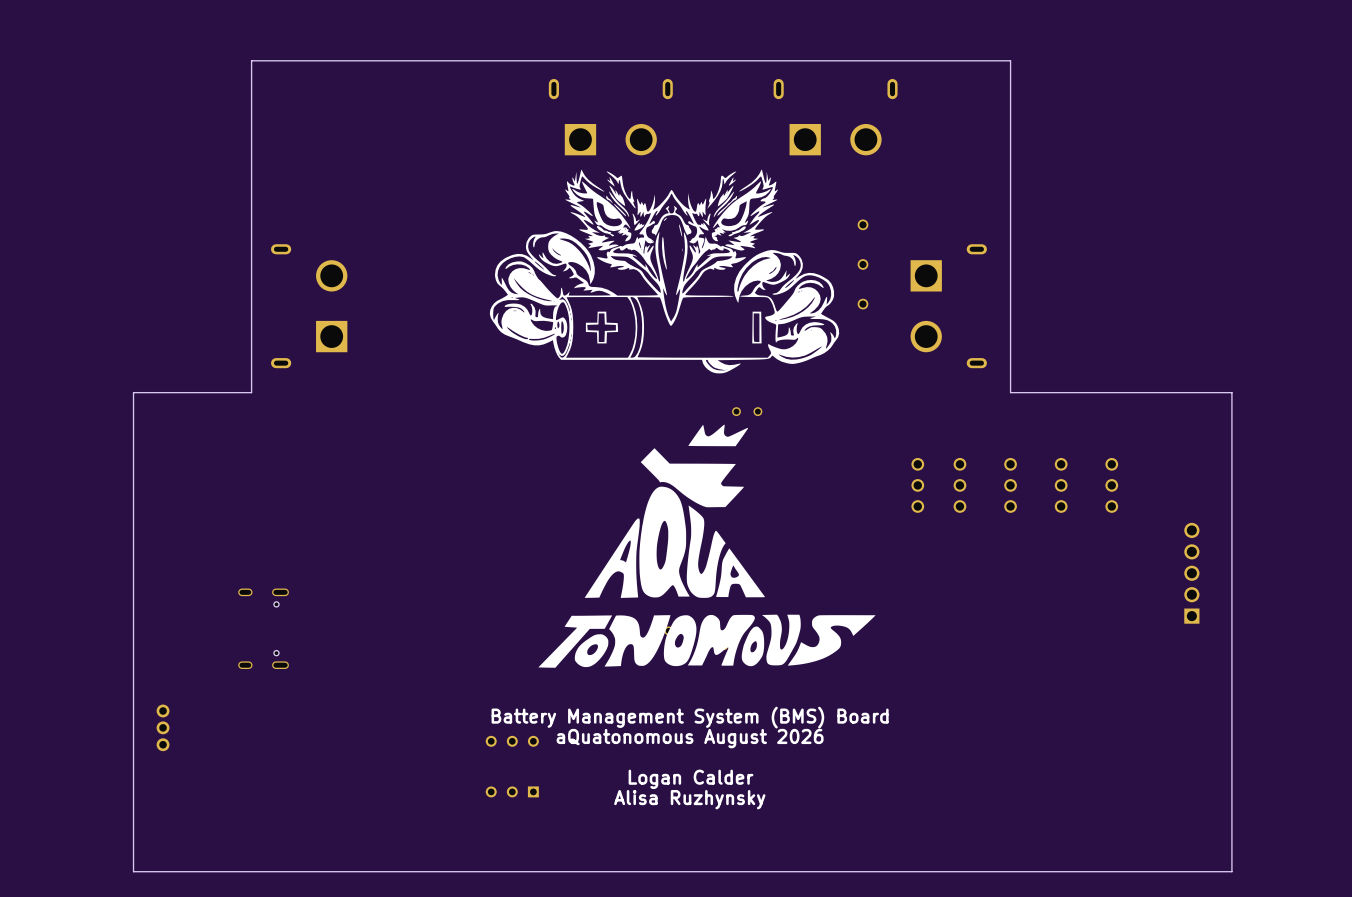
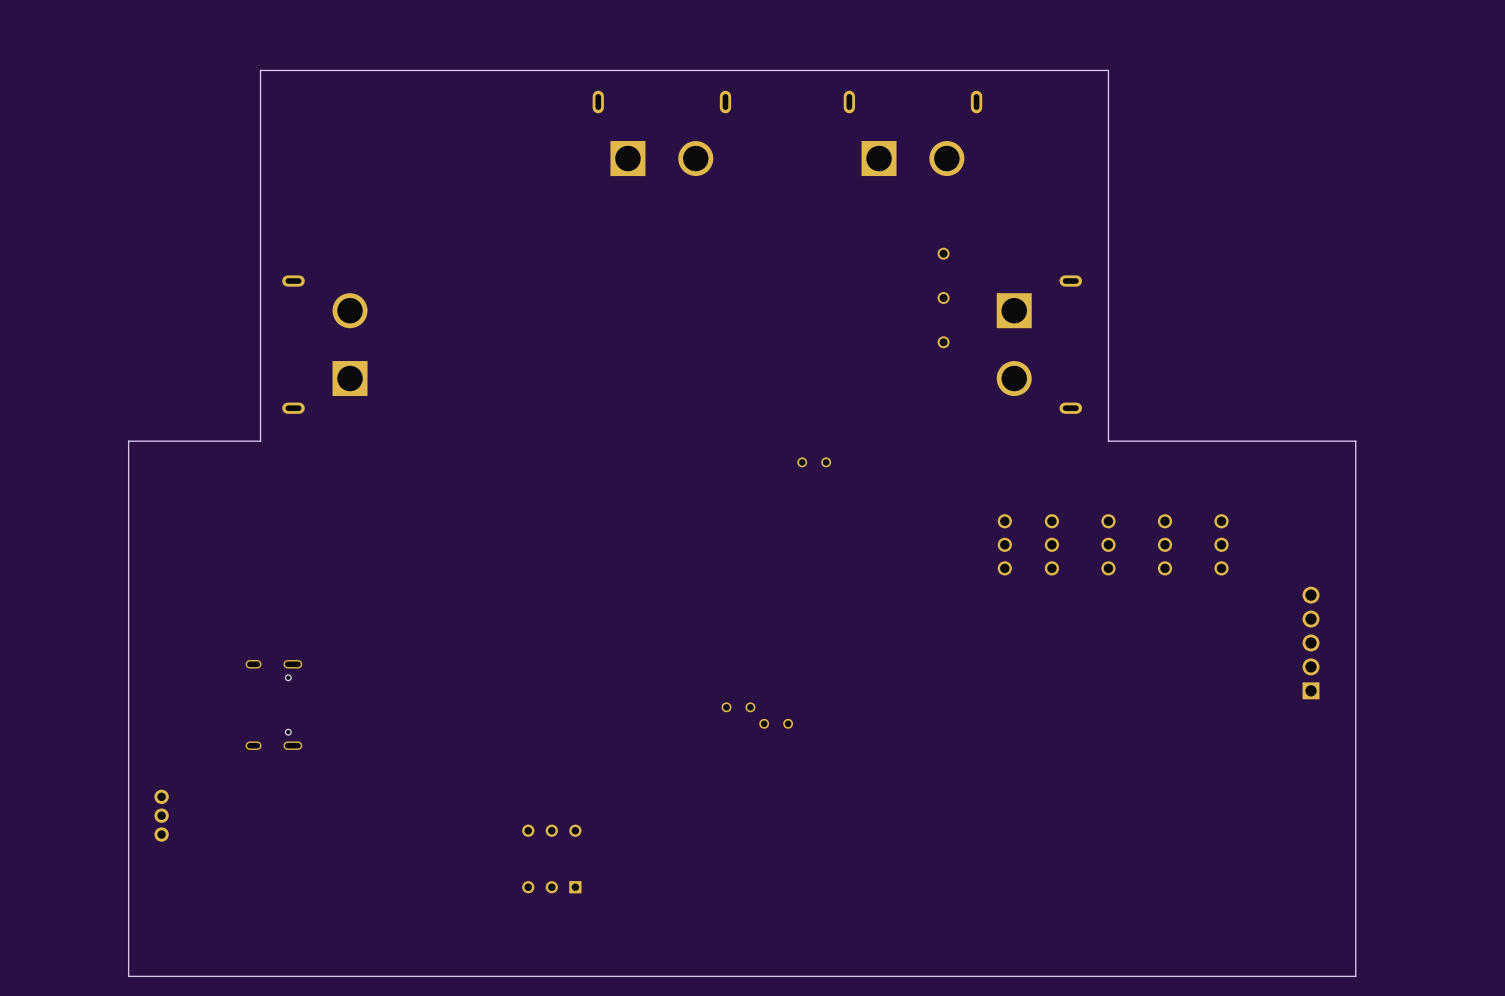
drawing: [489, 169, 840, 374] -> none
drawing: [538, 424, 876, 668] -> none
text: Battery Management System (BMS) Board (690, 717) -> none
text: aQuatonomous August 2026 (690, 738) -> none
text: Logan Calder (691, 779) -> none
text: Alisa Ruzhynsky (689, 799) -> none

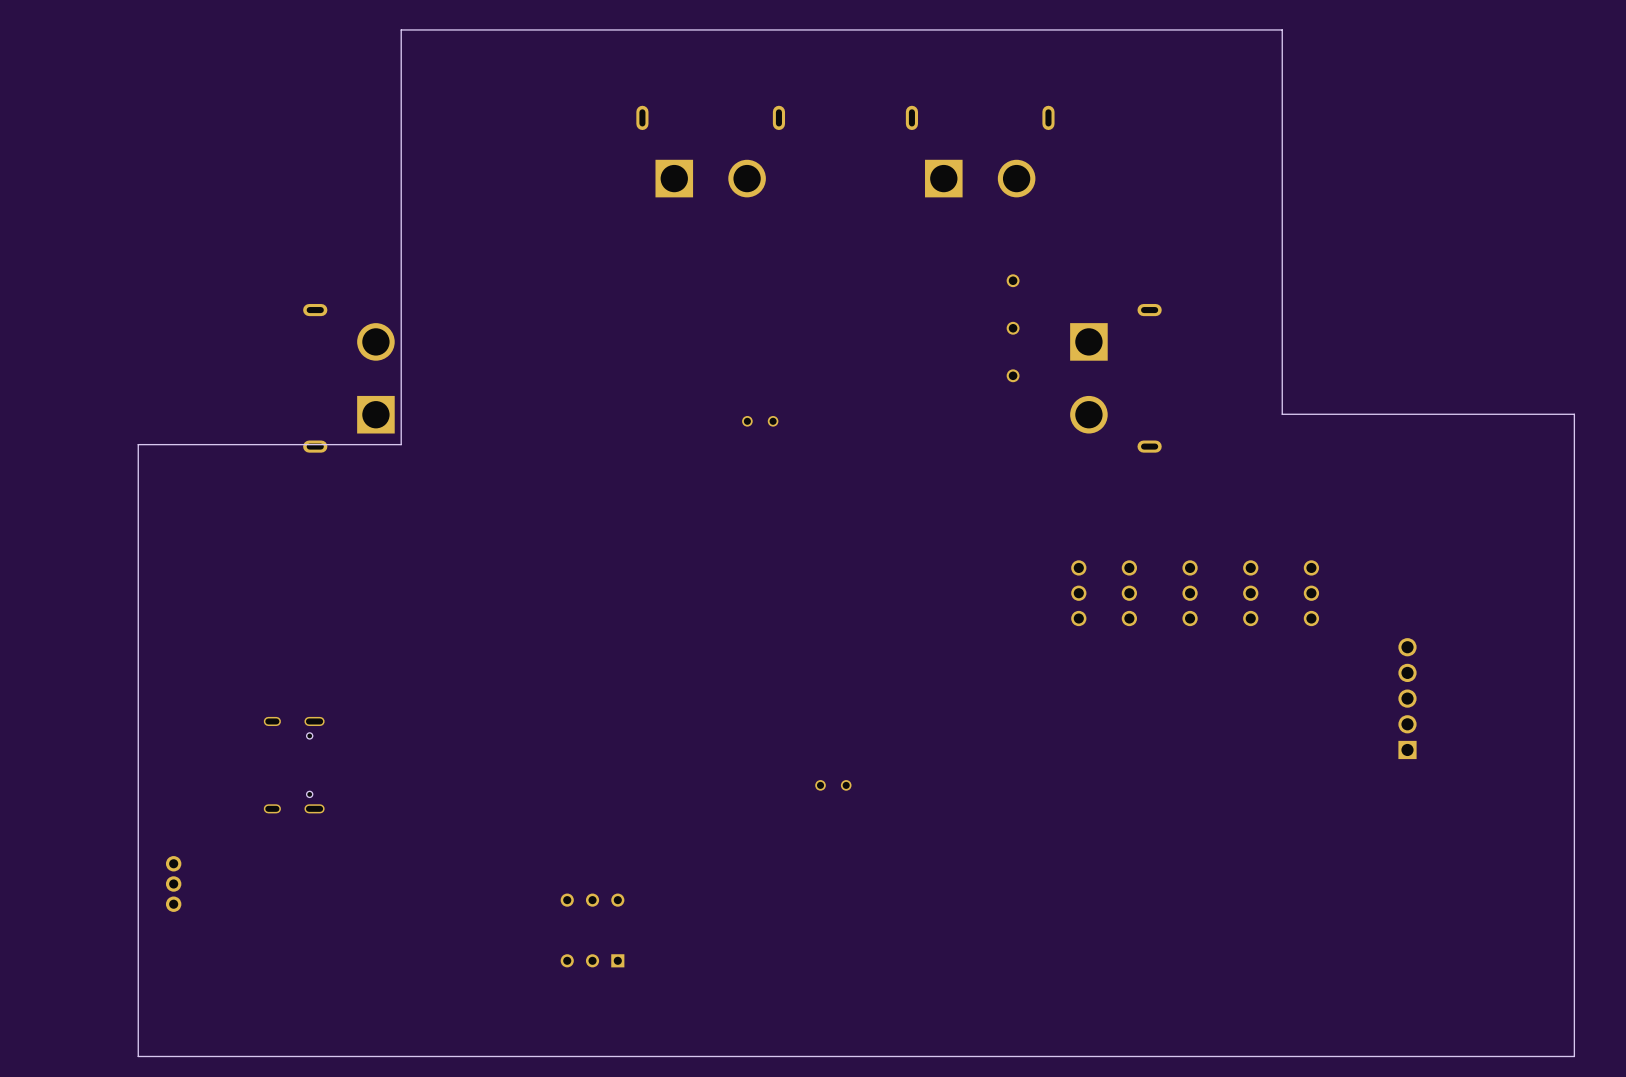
board edge: (128, 441) (260, 441) (260, 70) (1108, 70) (1108, 441) (1355, 441) (1355, 976) -> (138, 481) (138, 444) (401, 444) (401, 29) (1282, 29) (1282, 414) (1574, 414) (1574, 1056) (1455, 1056)
part position: (814, 462) -> (760, 421)
part: (738, 707) -> none

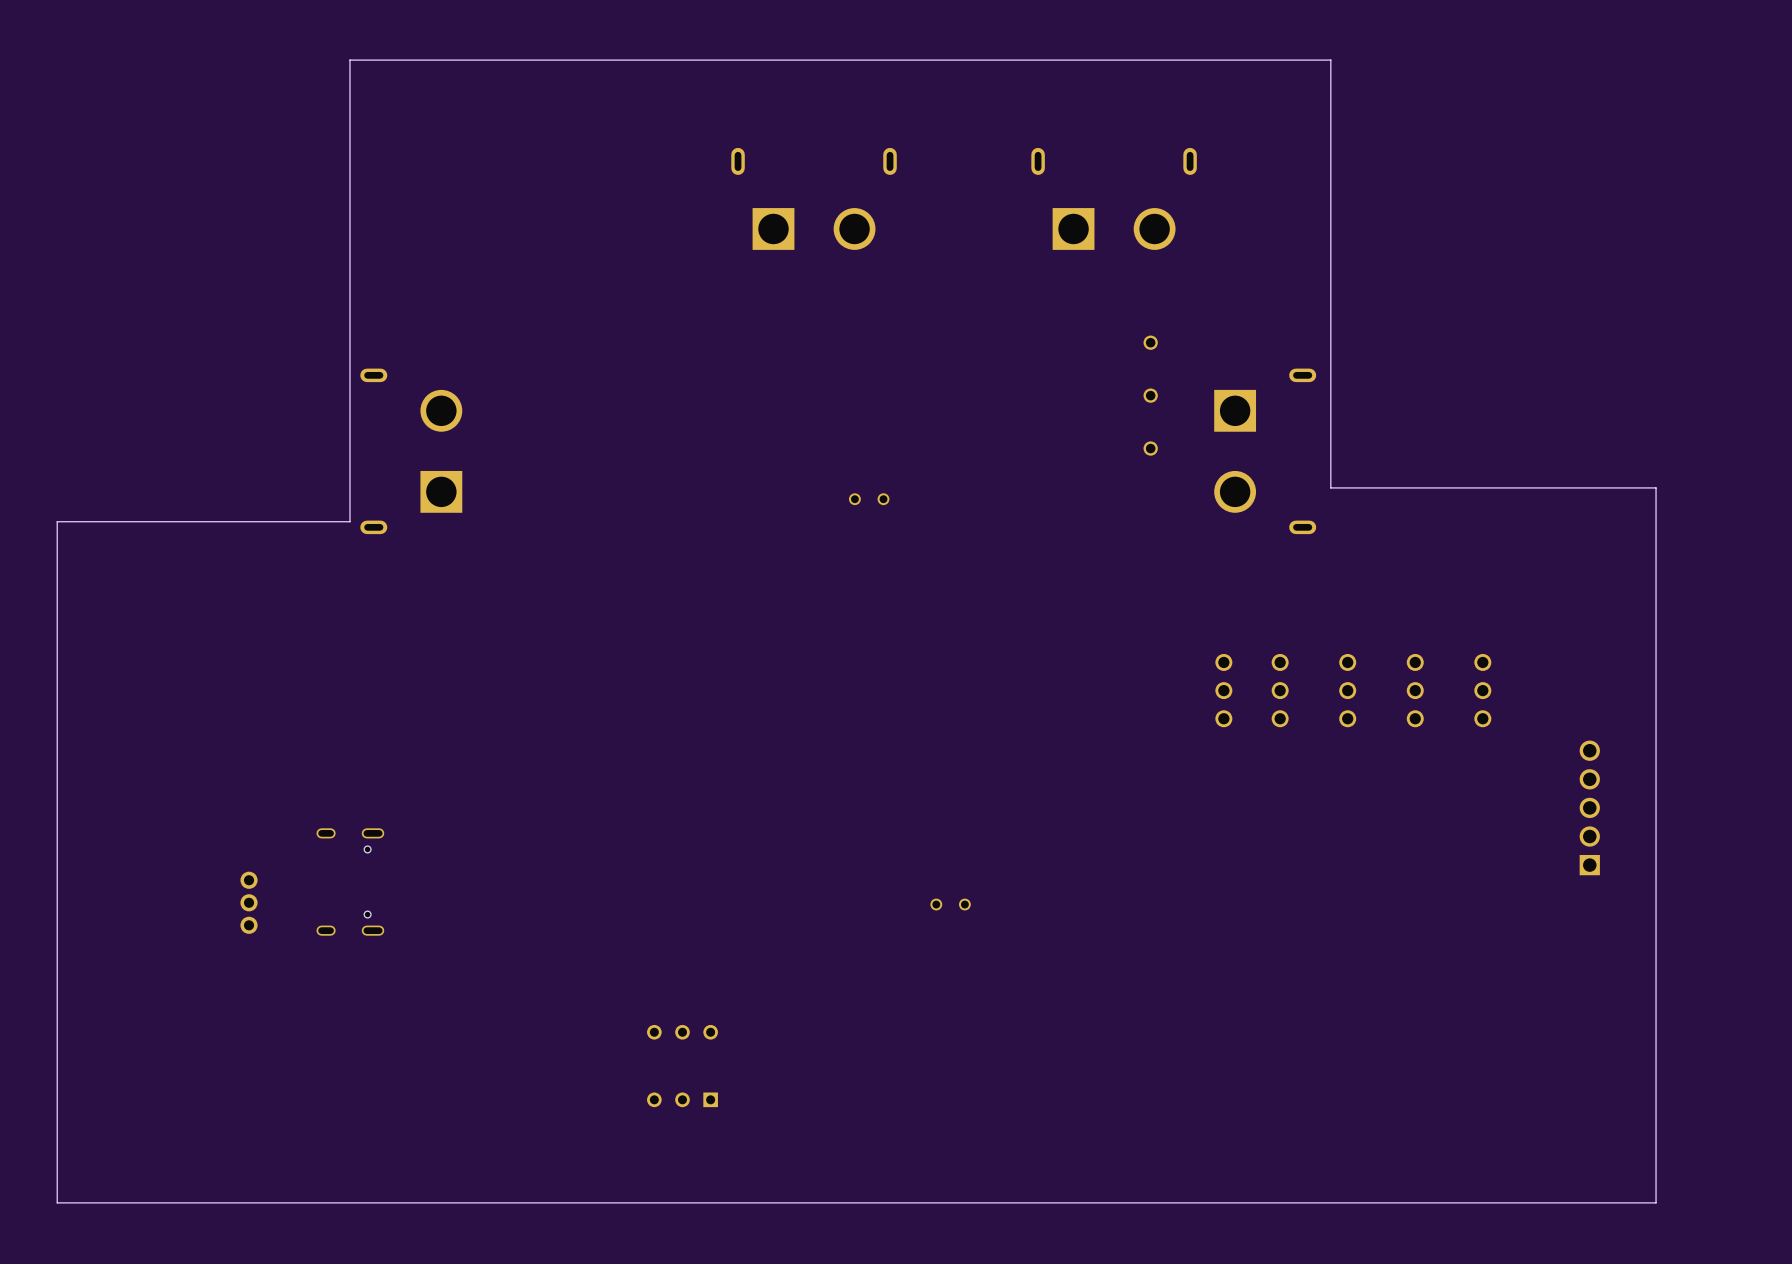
board edge: (1282, 29) (1282, 414) (1574, 414) (1574, 1056) (138, 1056) (138, 444) (401, 444) (401, 29) (1282, 29) -> (1330, 60) (1330, 487) (1656, 487) (1656, 1202) (57, 1202) (57, 521) (349, 521) (349, 60) (1330, 60)
part position: (173, 883) -> (249, 902)

